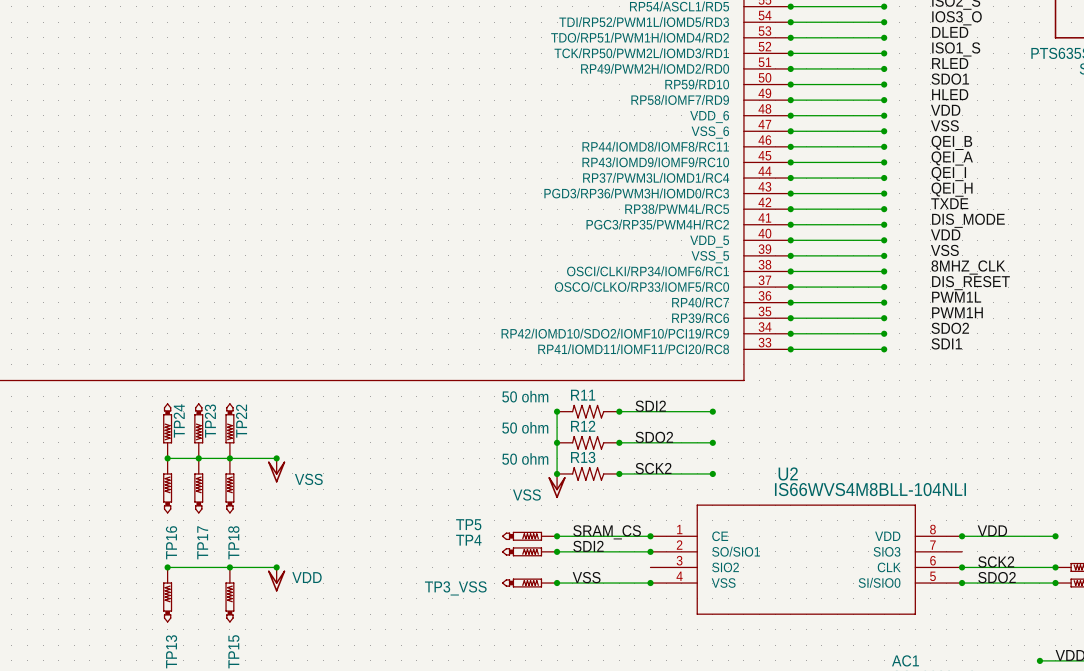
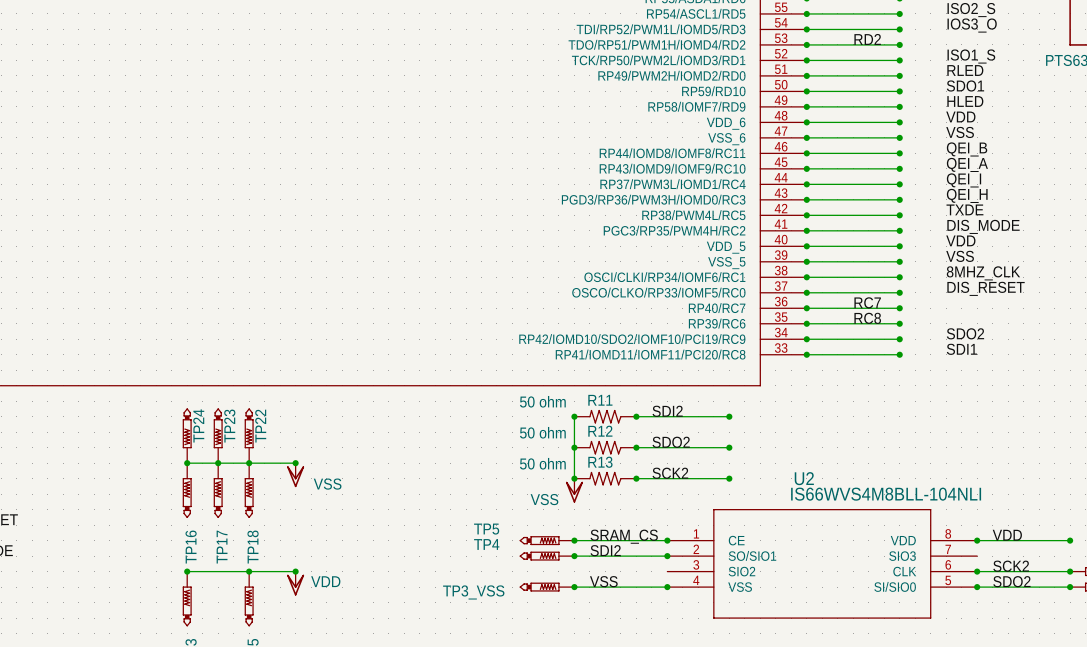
label: none -> RD2 (867, 39)
label: DLED (950, 32) -> none
label: none -> RC7 (867, 302)
label: PWM1L (956, 297) -> none
label: none -> RC8 (867, 318)
label: PWM1H (957, 312) -> none

